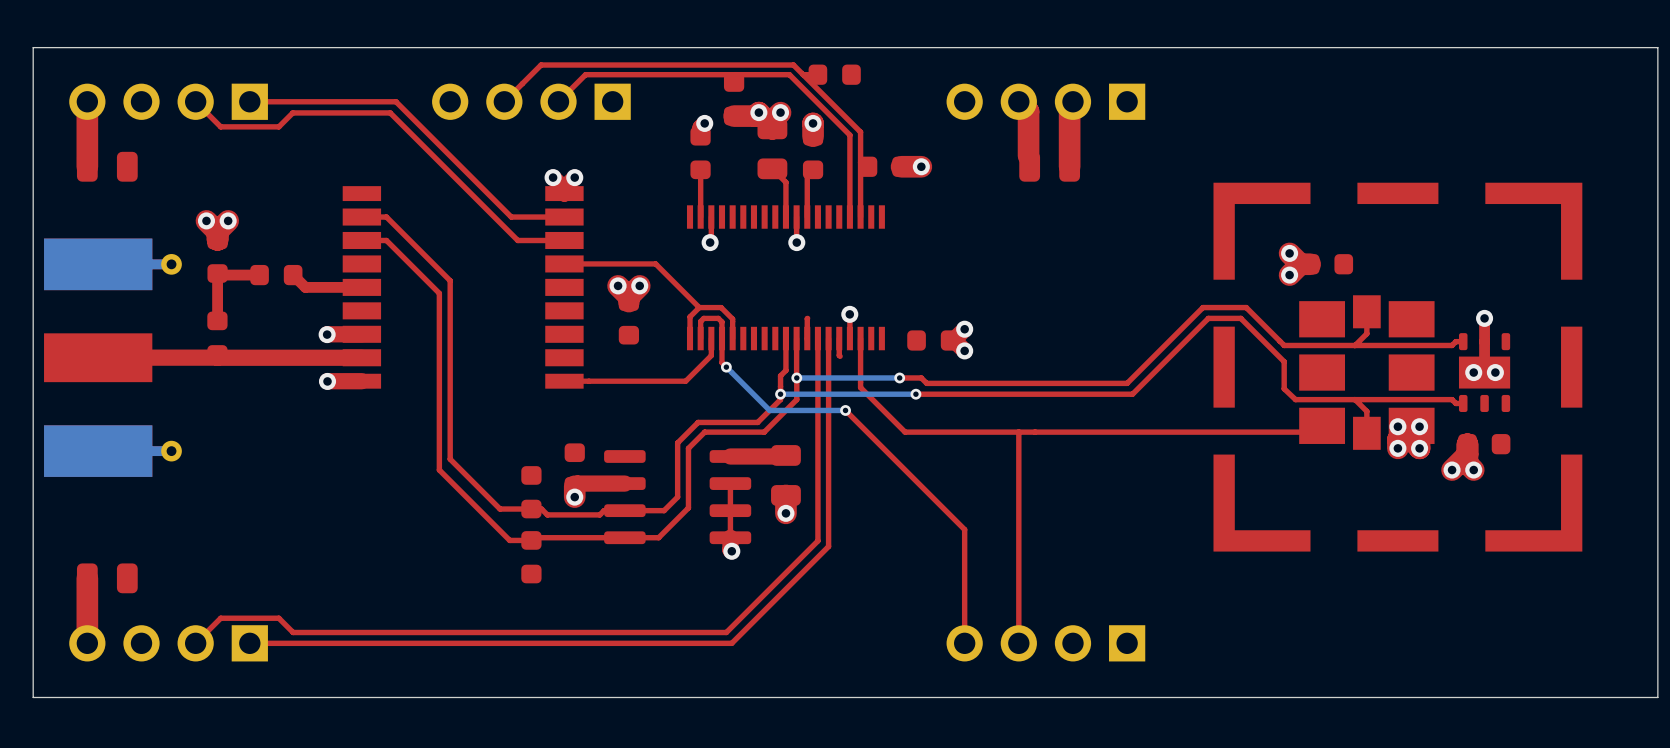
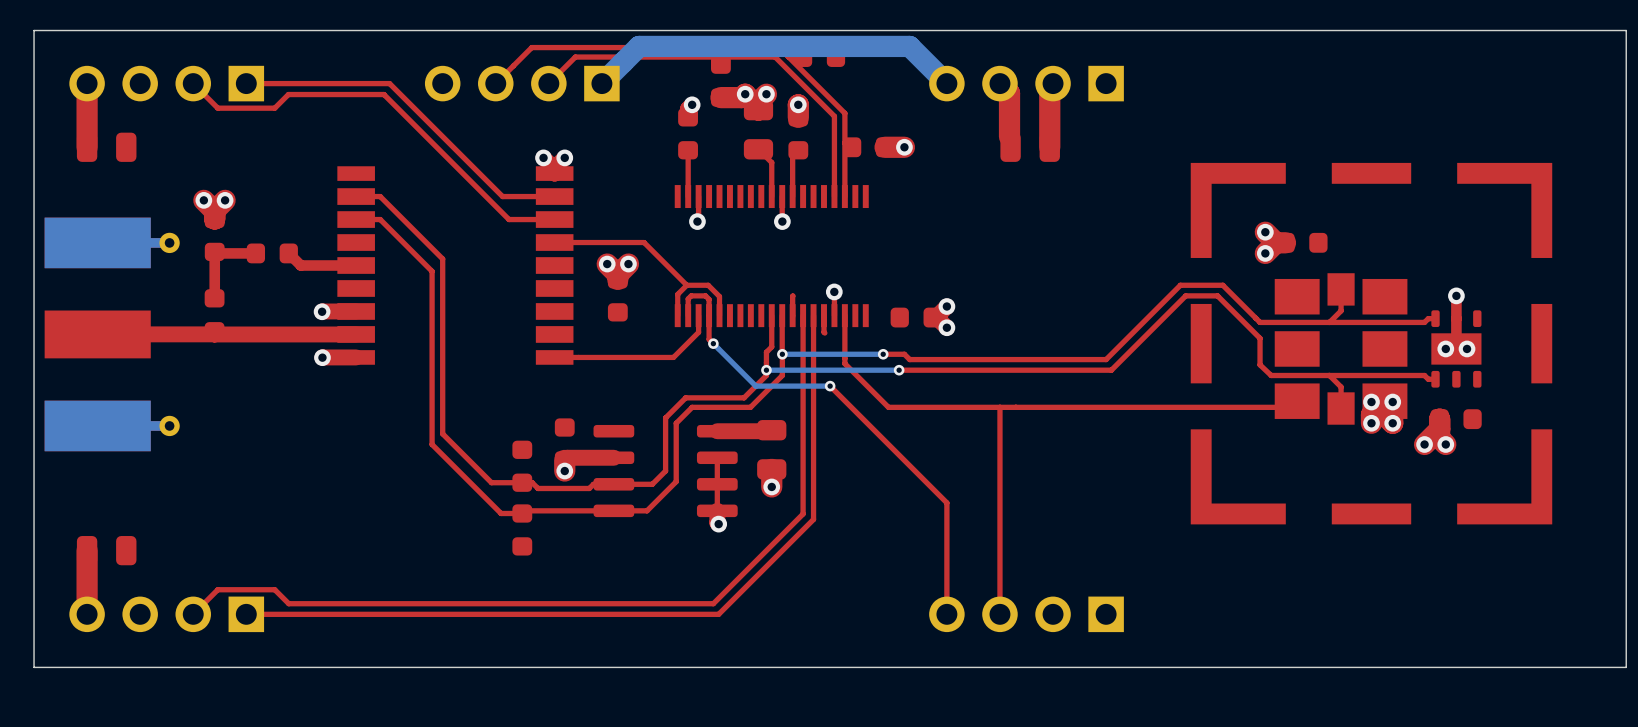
bottom track: none -> (946, 83) (909, 46) (639, 46) (601, 83)

